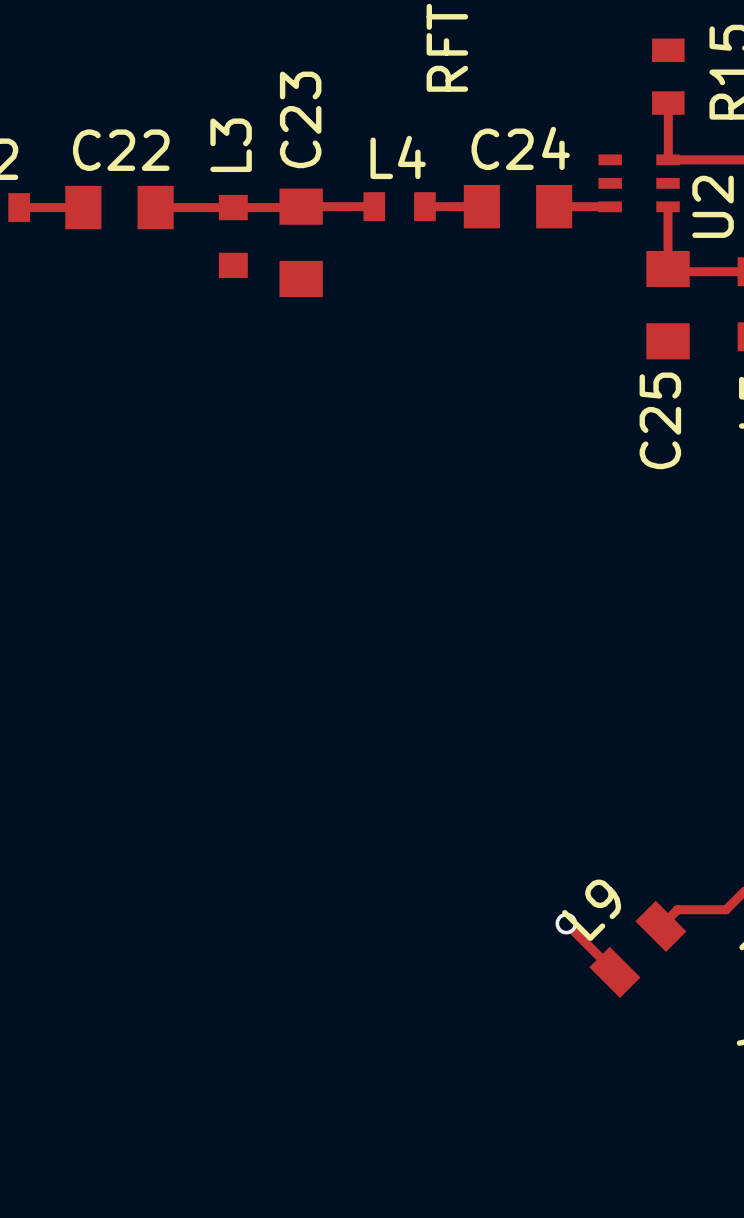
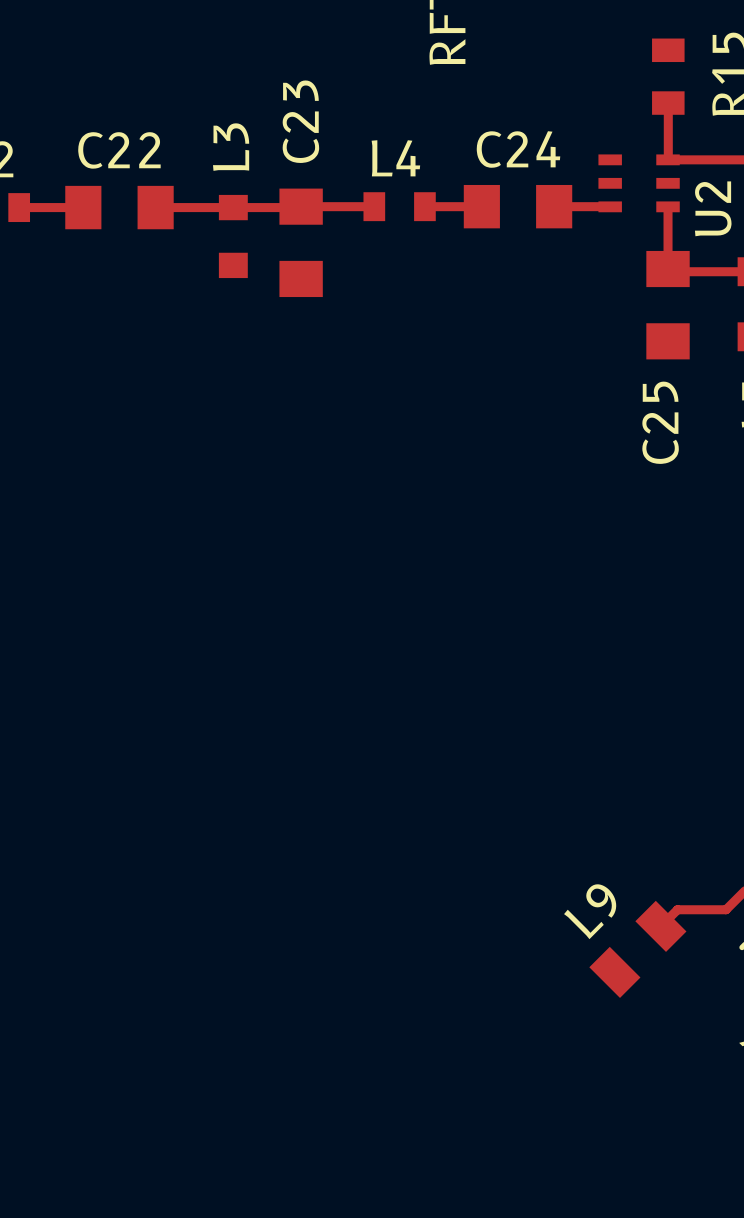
track: (566, 923) (614, 972) -> none
via: (566, 923) -> none

